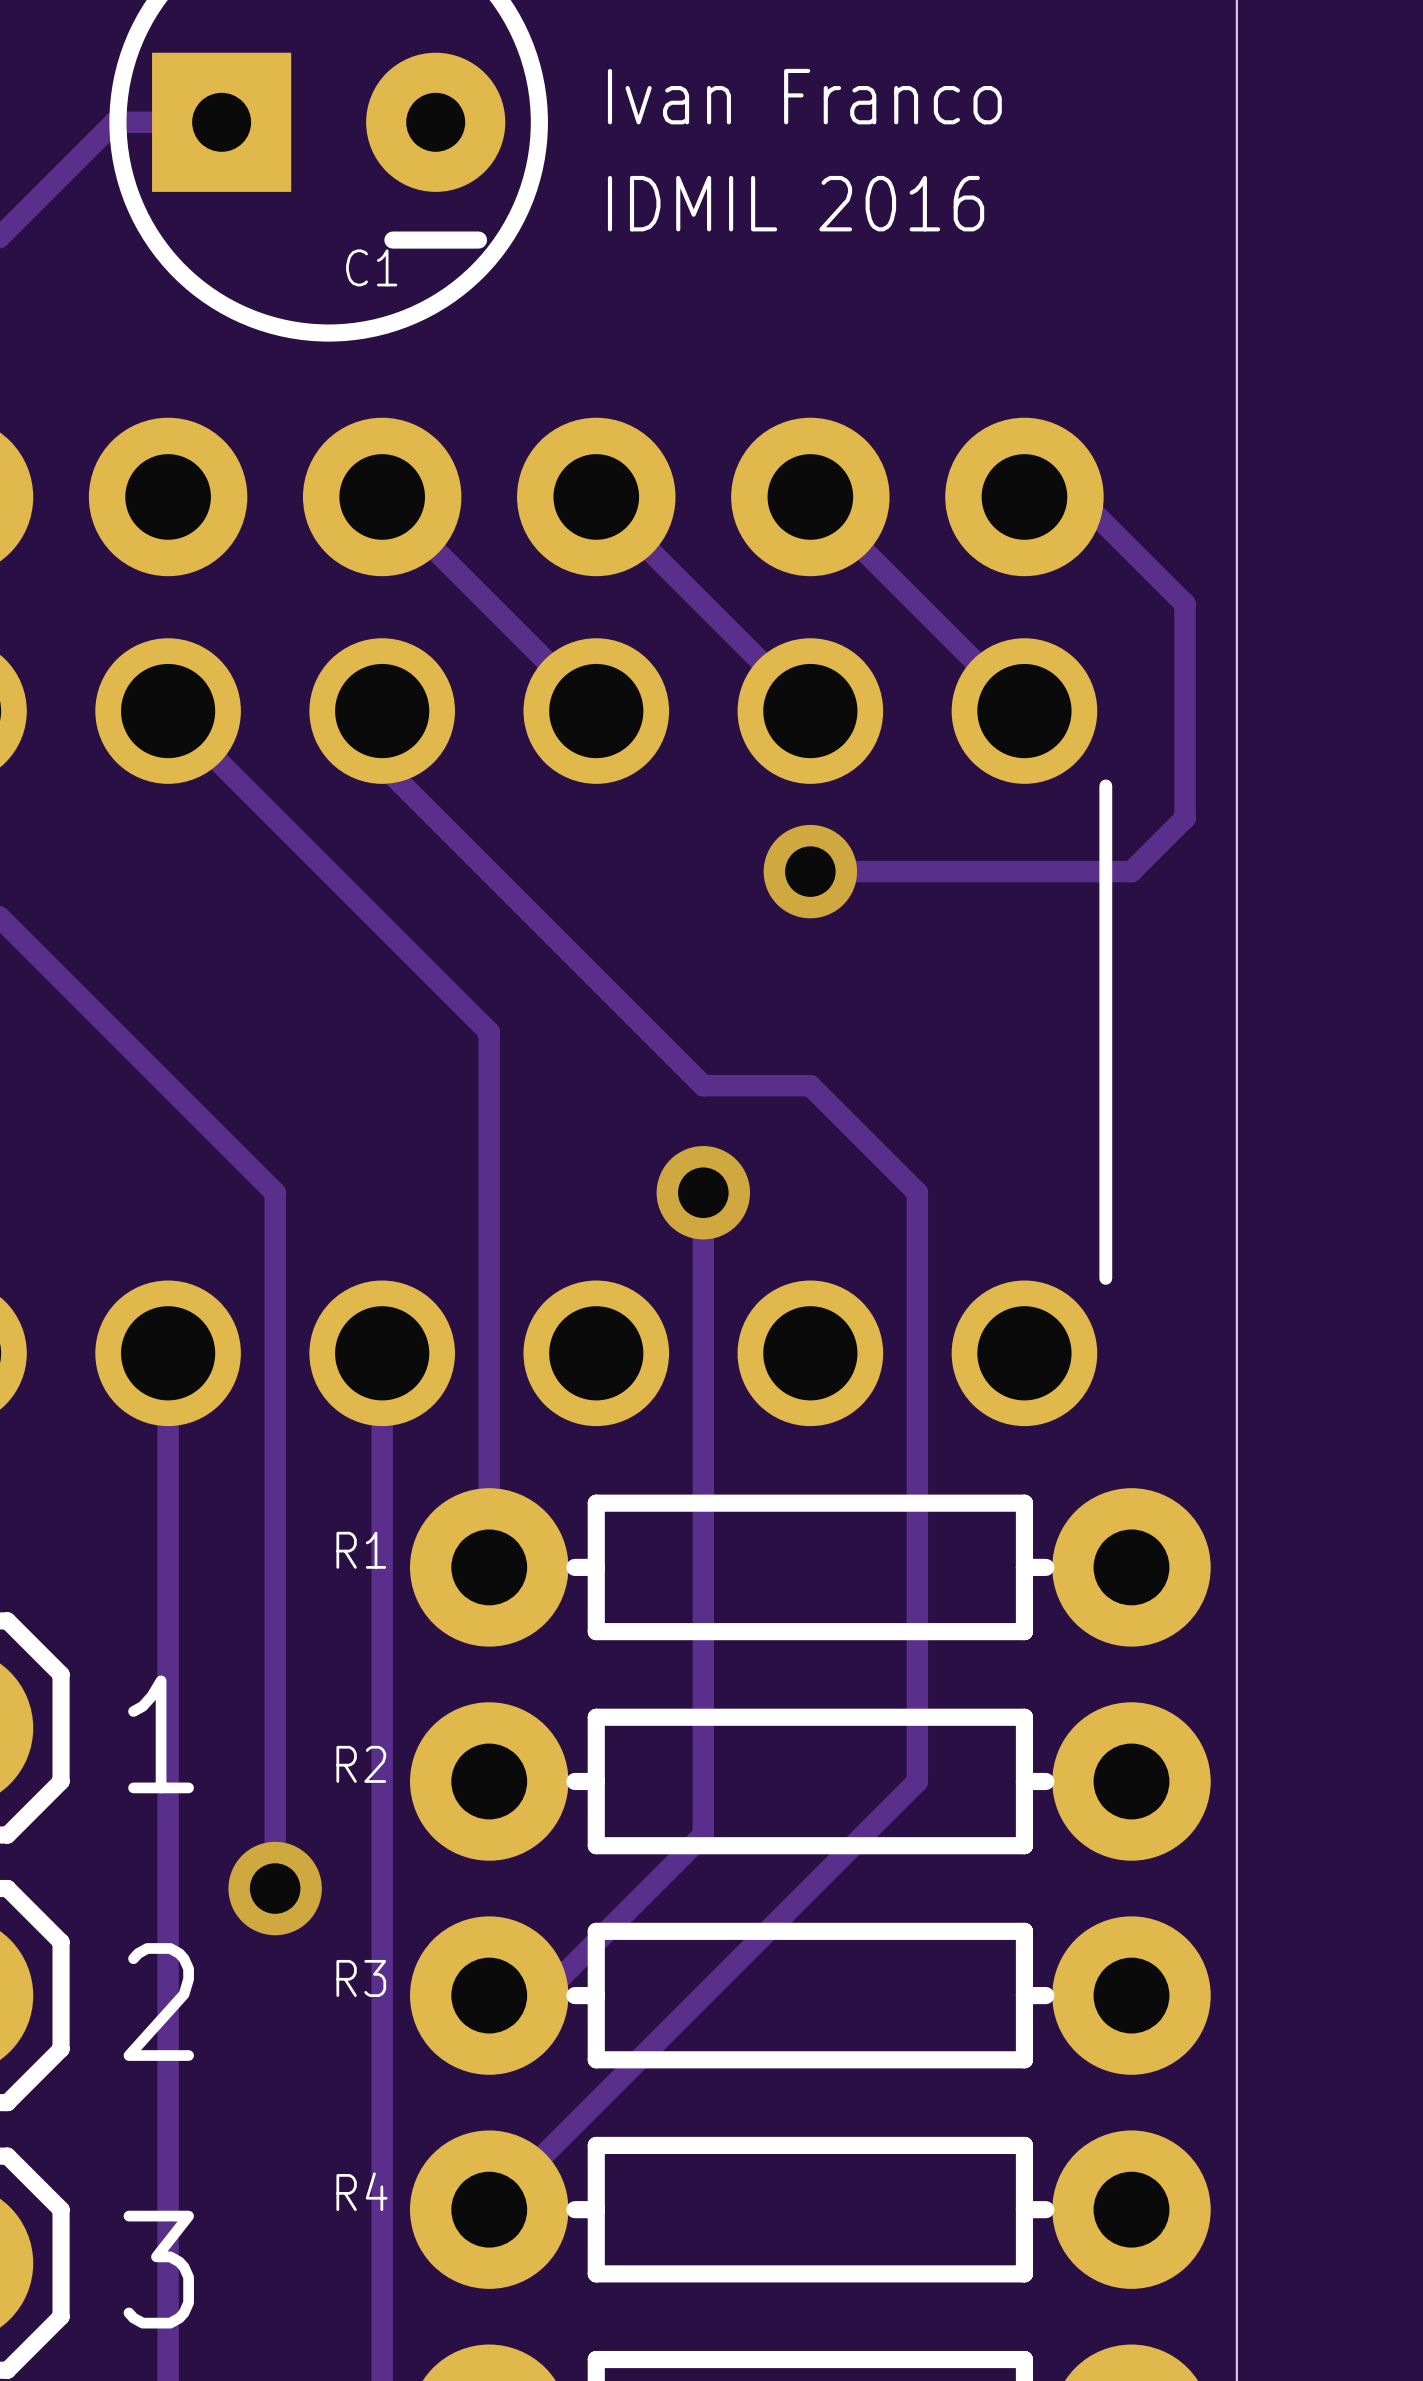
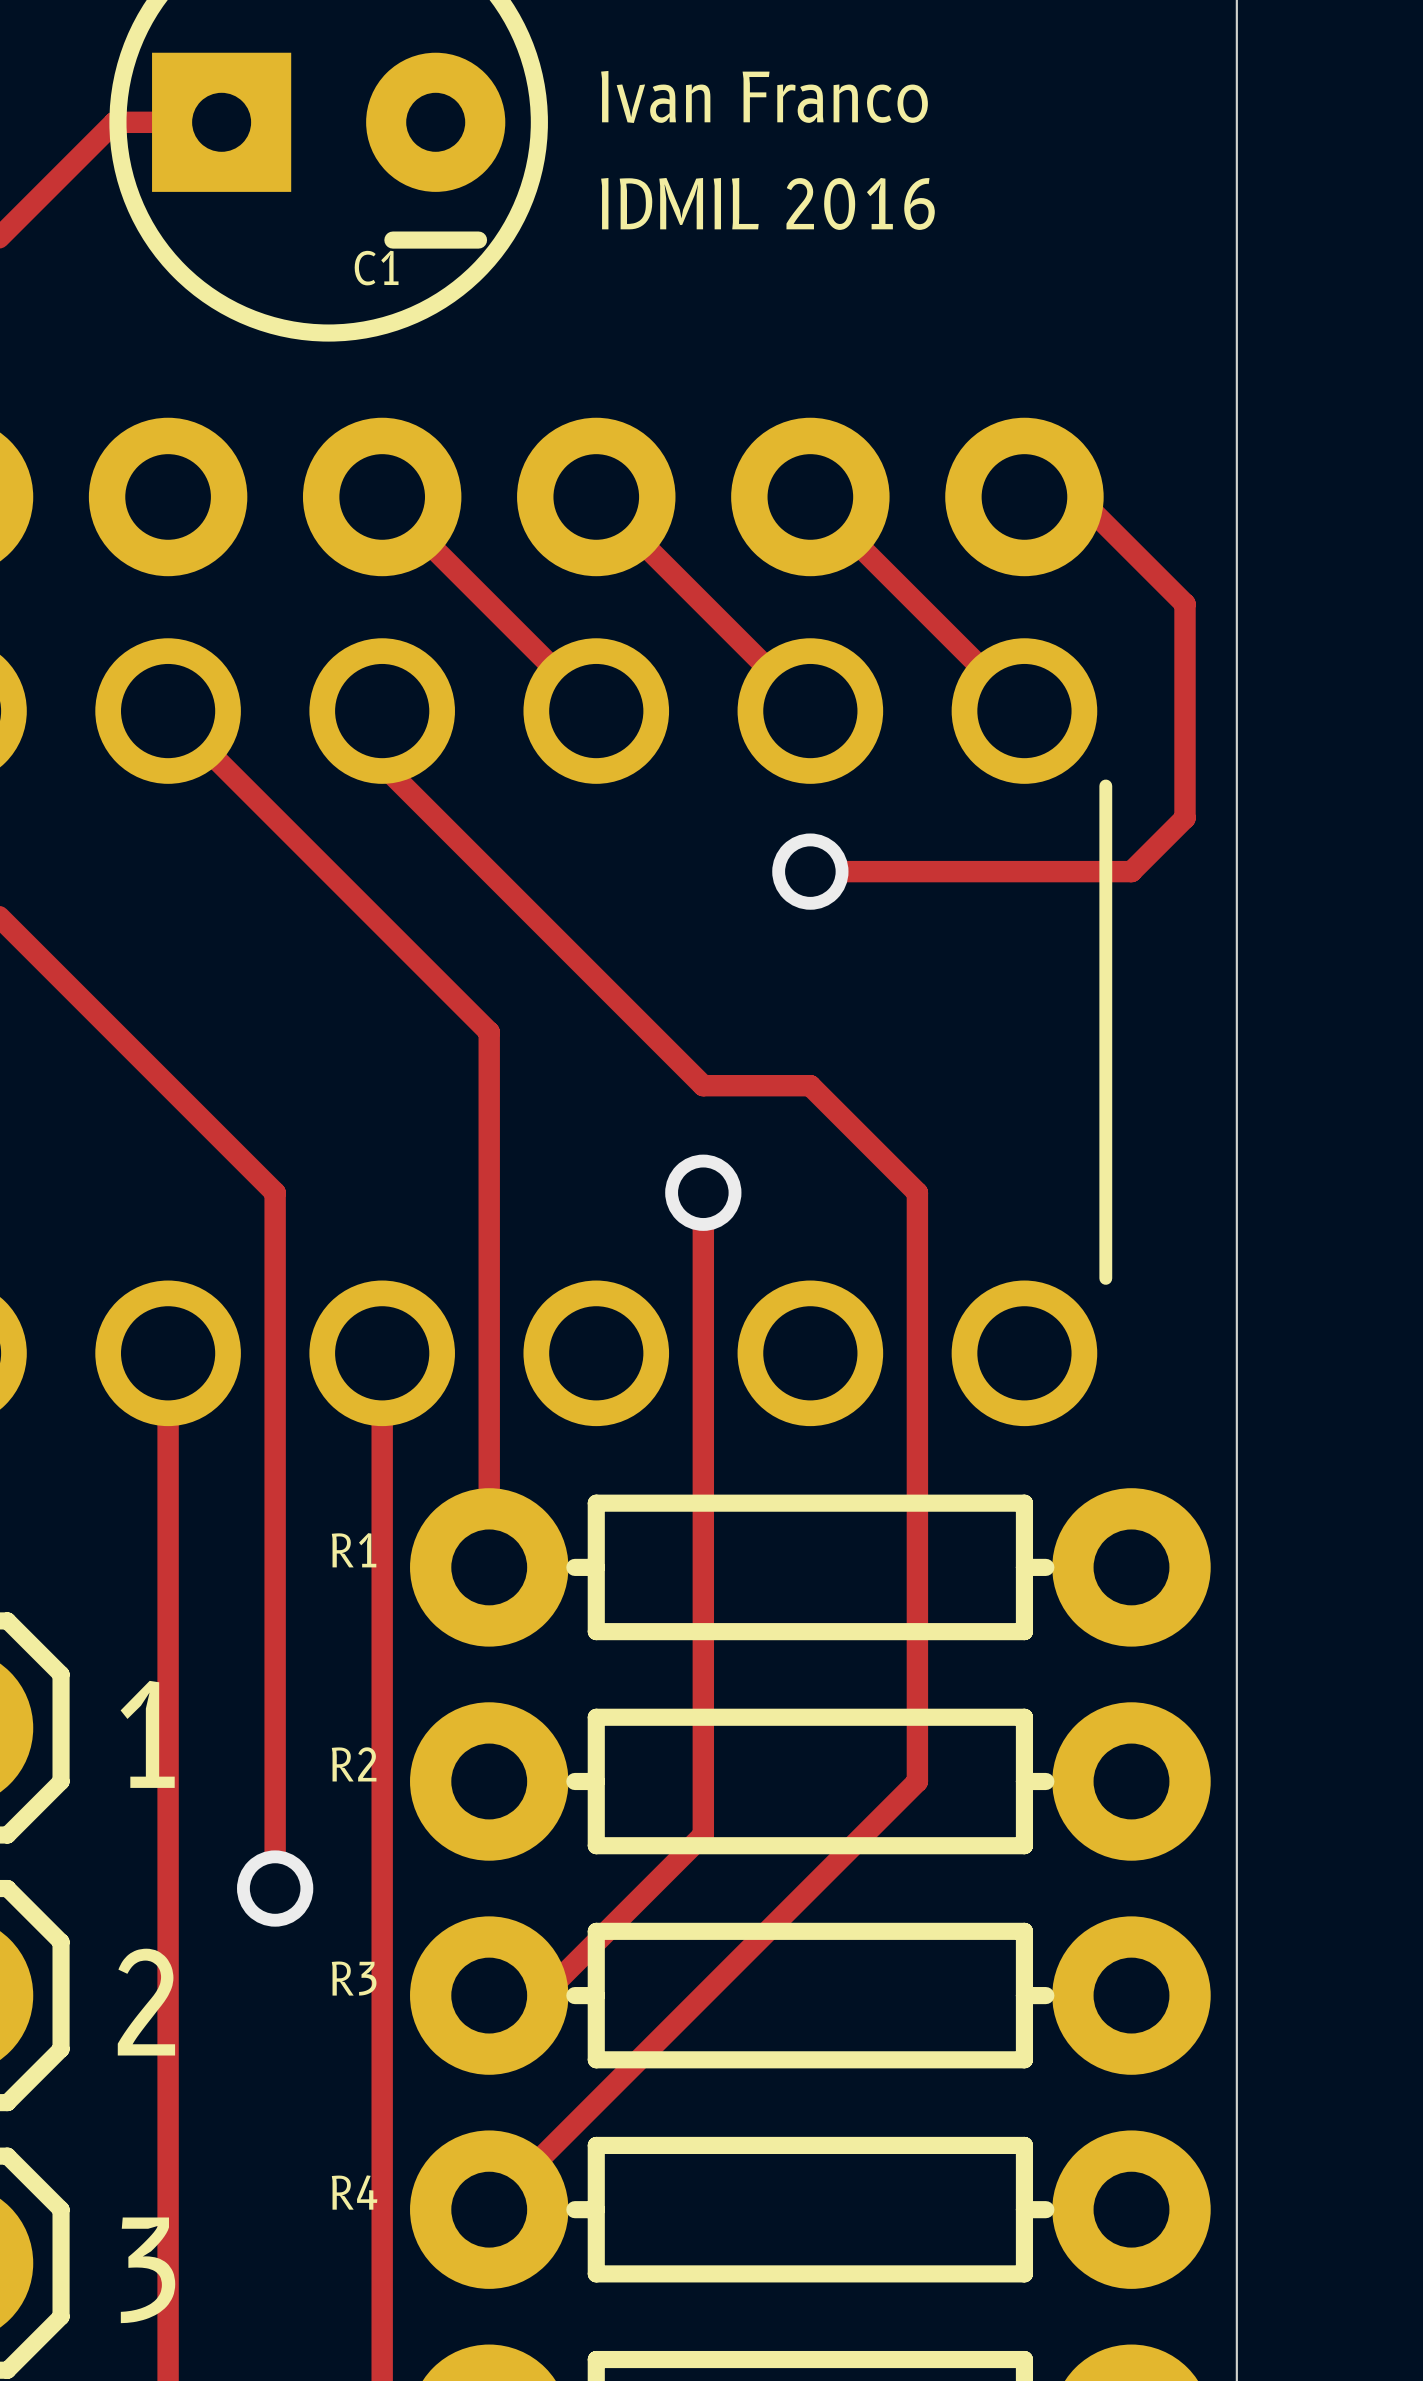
via size: [763, 824, 858, 919] -> [772, 833, 849, 910]
via size: [656, 1146, 751, 1240] -> [665, 1154, 742, 1231]
via size: [228, 1841, 322, 1936] -> [237, 1850, 314, 1927]

